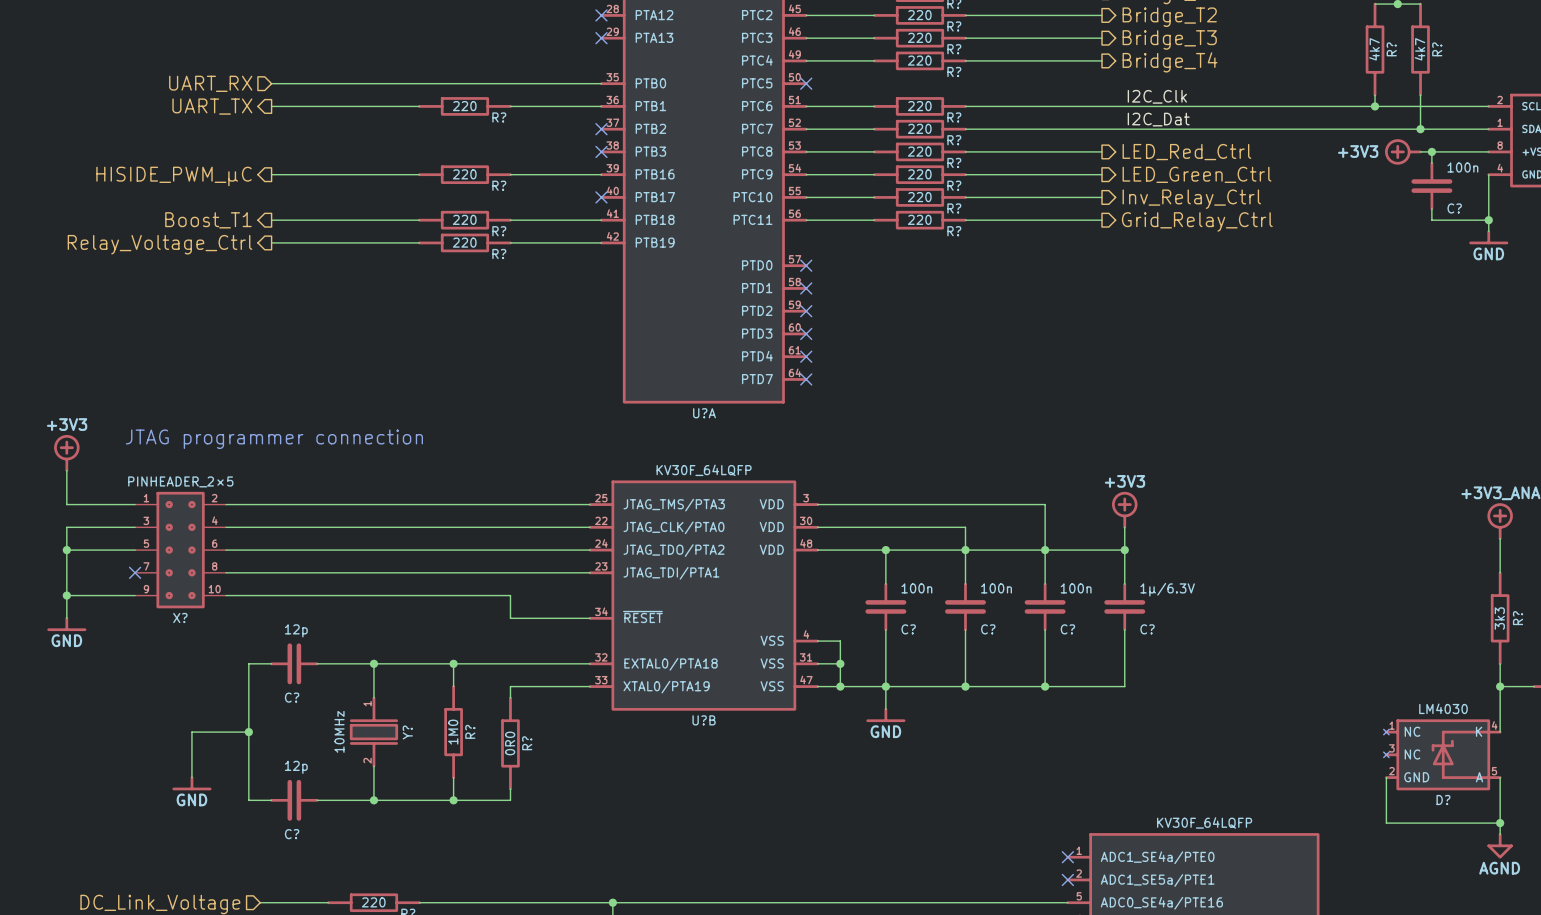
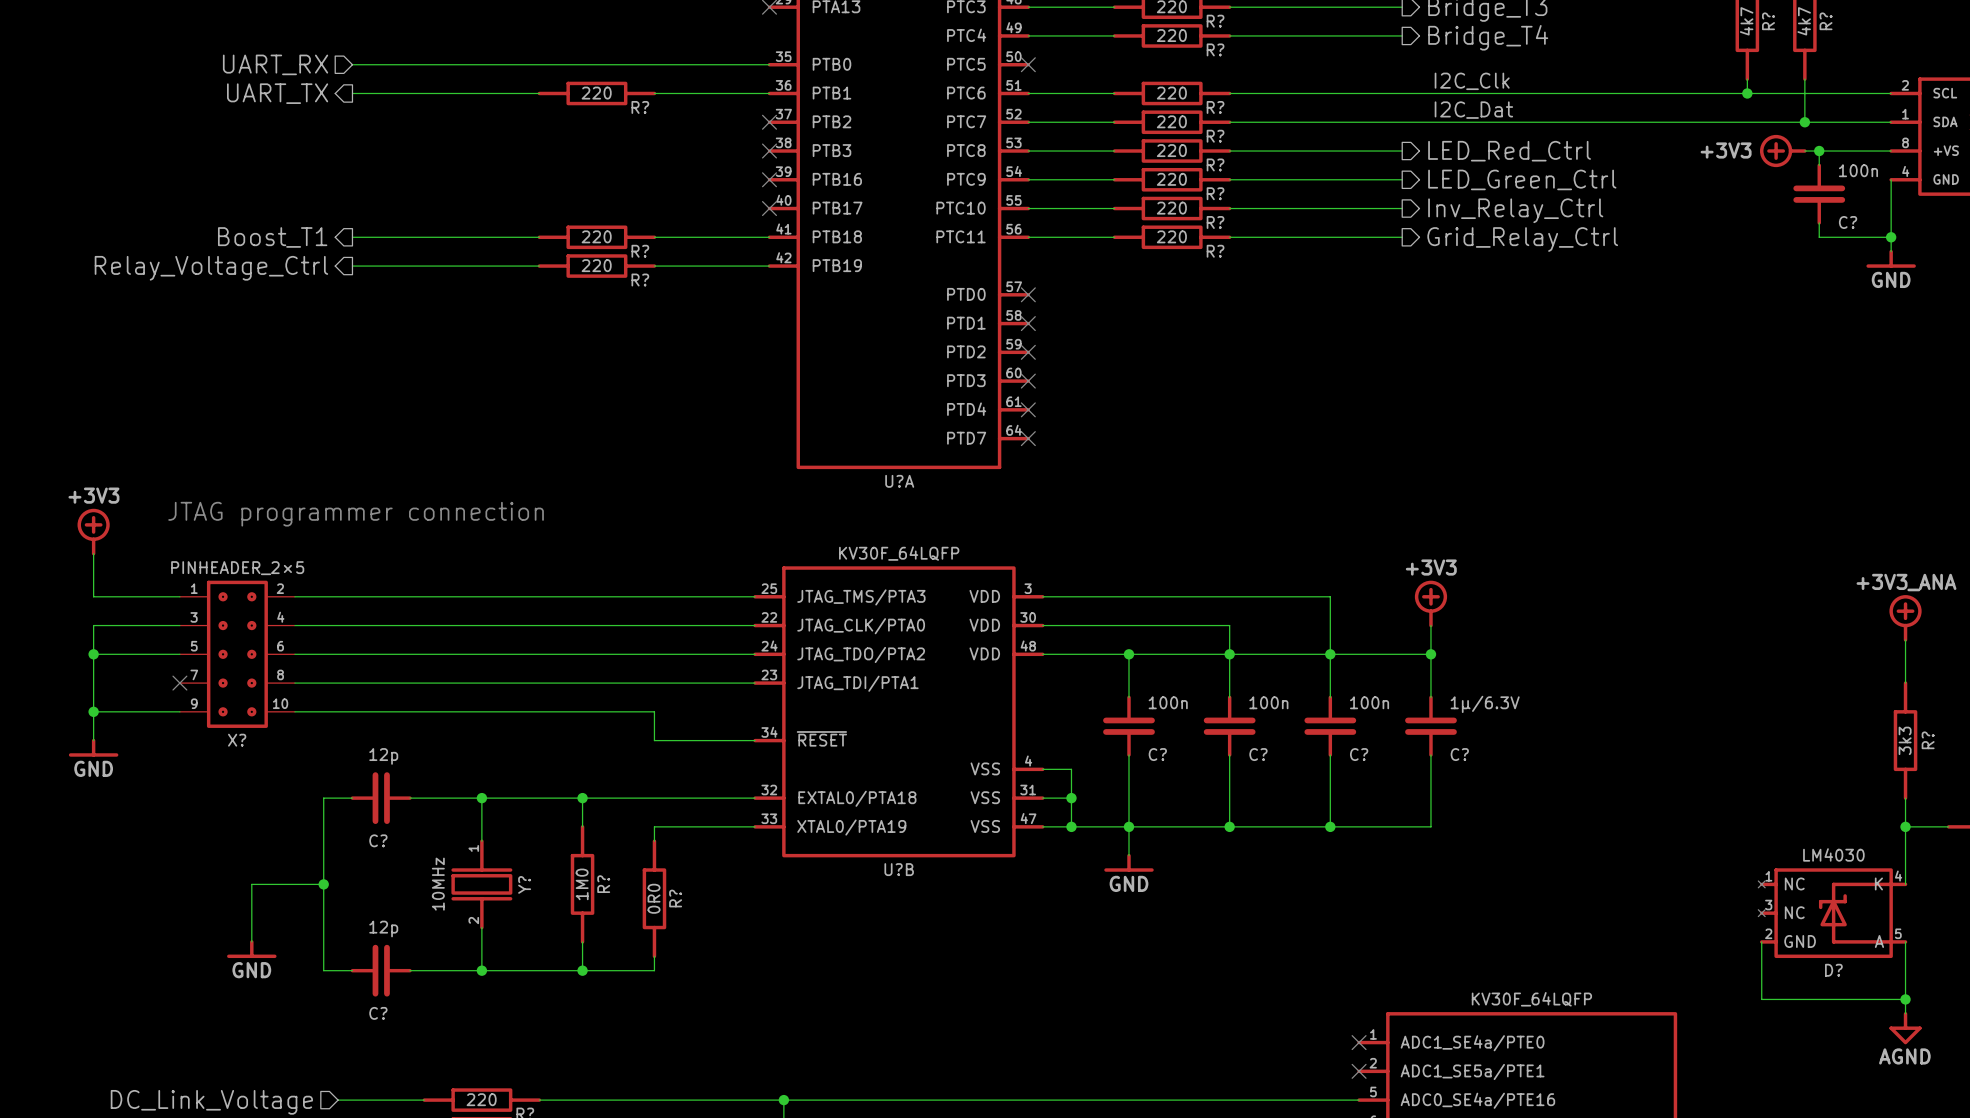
wire: (271, 174) (419, 174) -> none
R?: 220 (464, 174) -> none
wire: (510, 174) (601, 174) -> none
no-connect mark: none -> (769, 179)
hierarchical label: HISIDE_PWM_µC (174, 176) -> none

